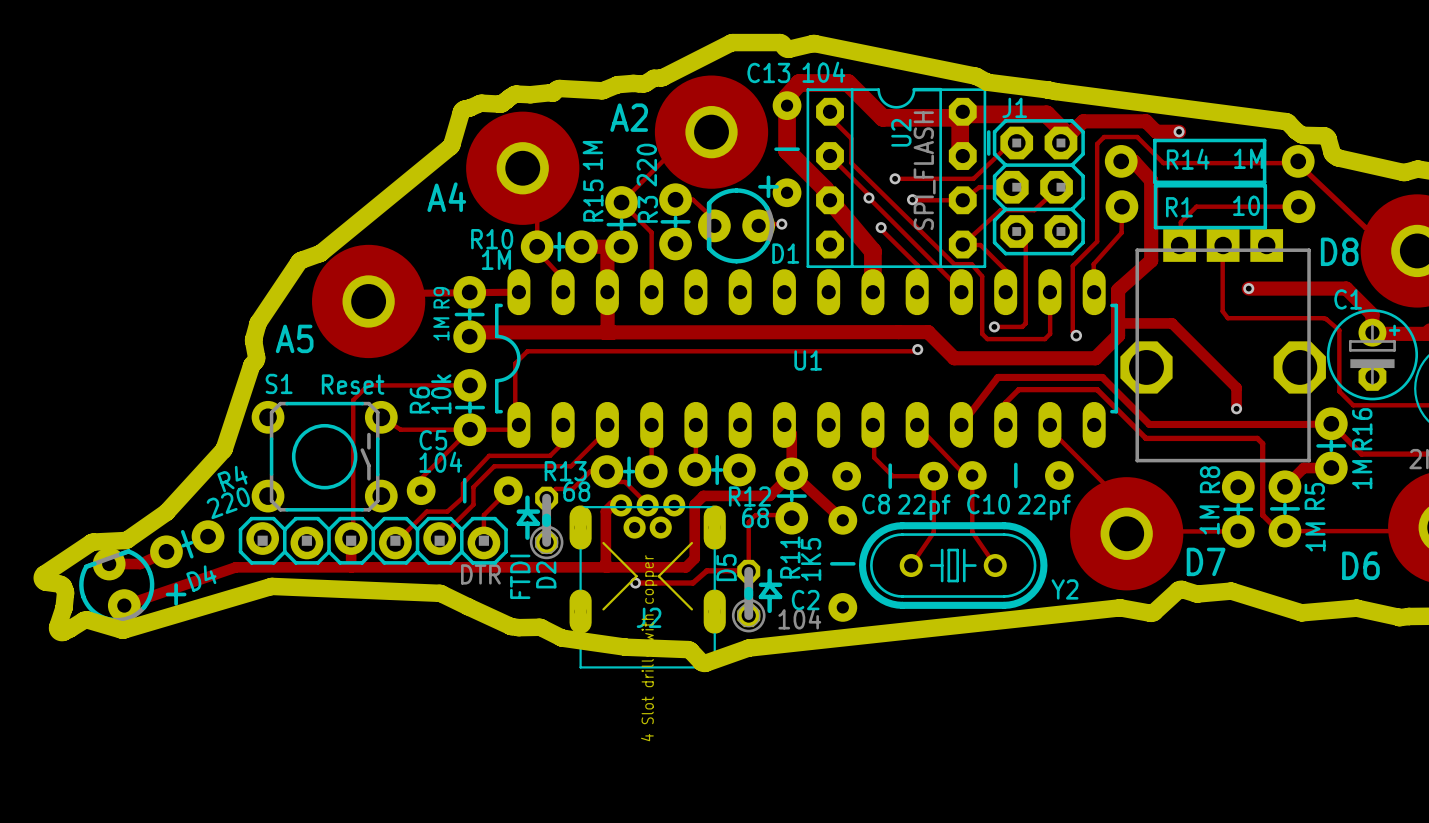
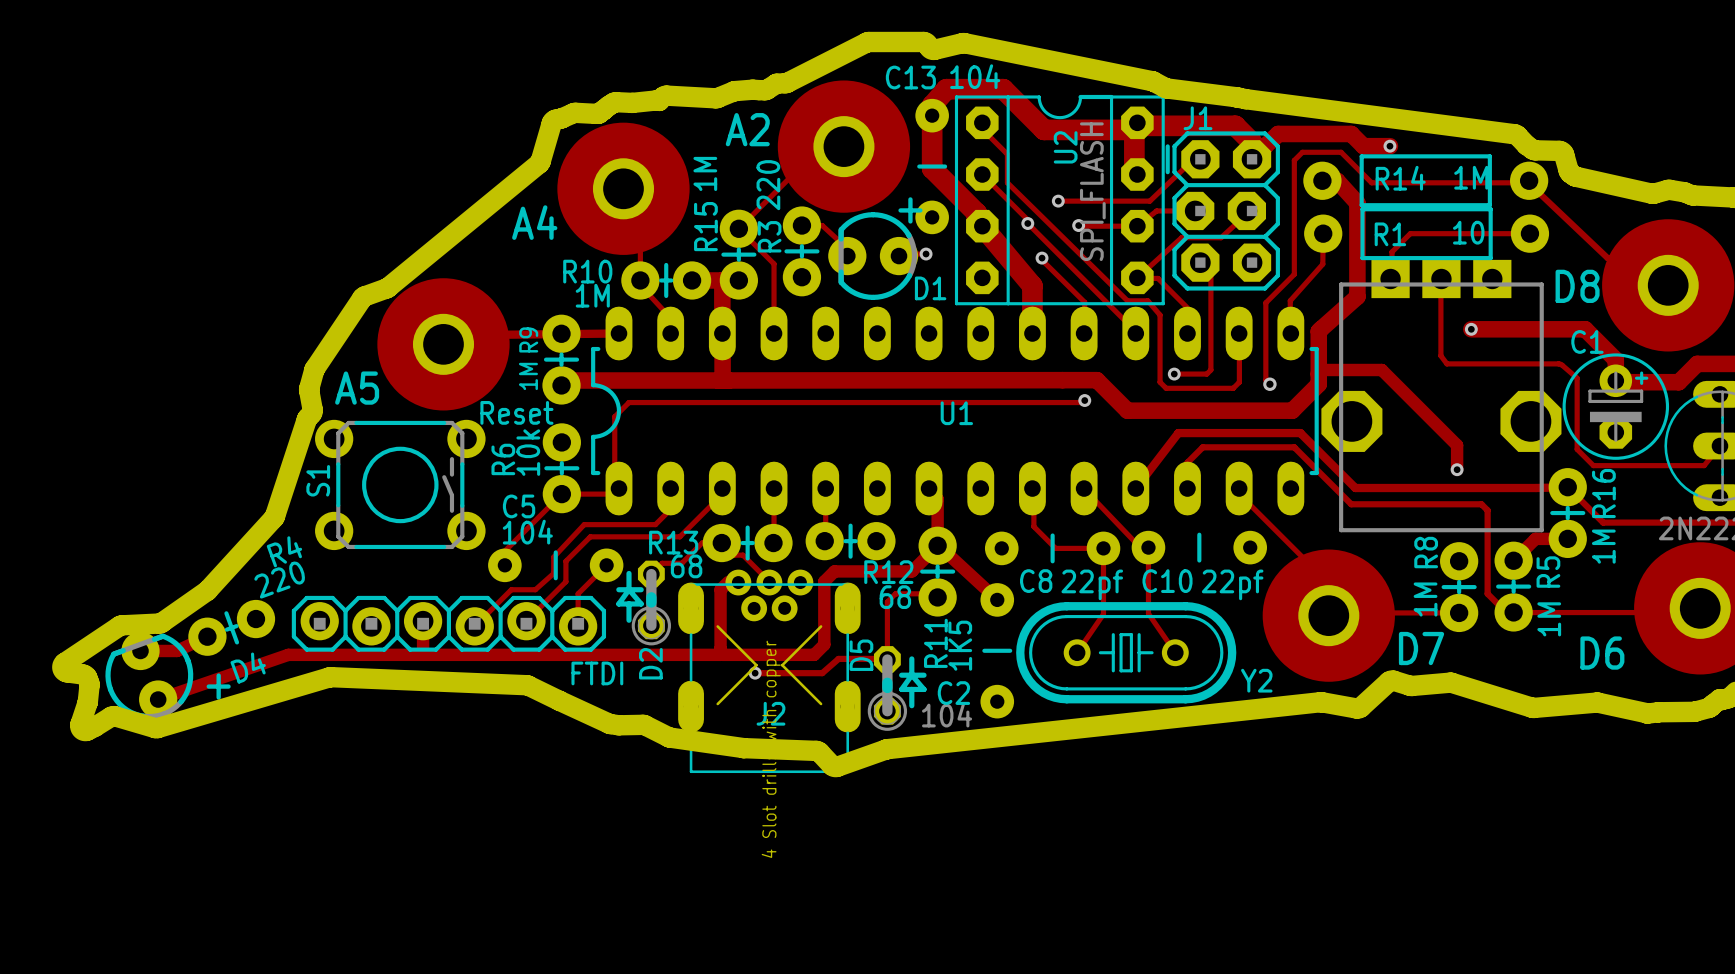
S1 name rotation: 0° (279, 383) -> 90° counterclockwise (318, 480)
text position: Reset (353, 384) -> Reset (516, 412)
track: (469, 385) (367, 385) (353, 400) (353, 536) -> none
track: (381, 417) (400, 429) (469, 429) -> none
S1 position: (324, 456) -> (400, 484)
FTDI value: DTR (480, 574) -> none
FTDI name rotation: 0° (520, 576) -> 90° clockwise (597, 673)

